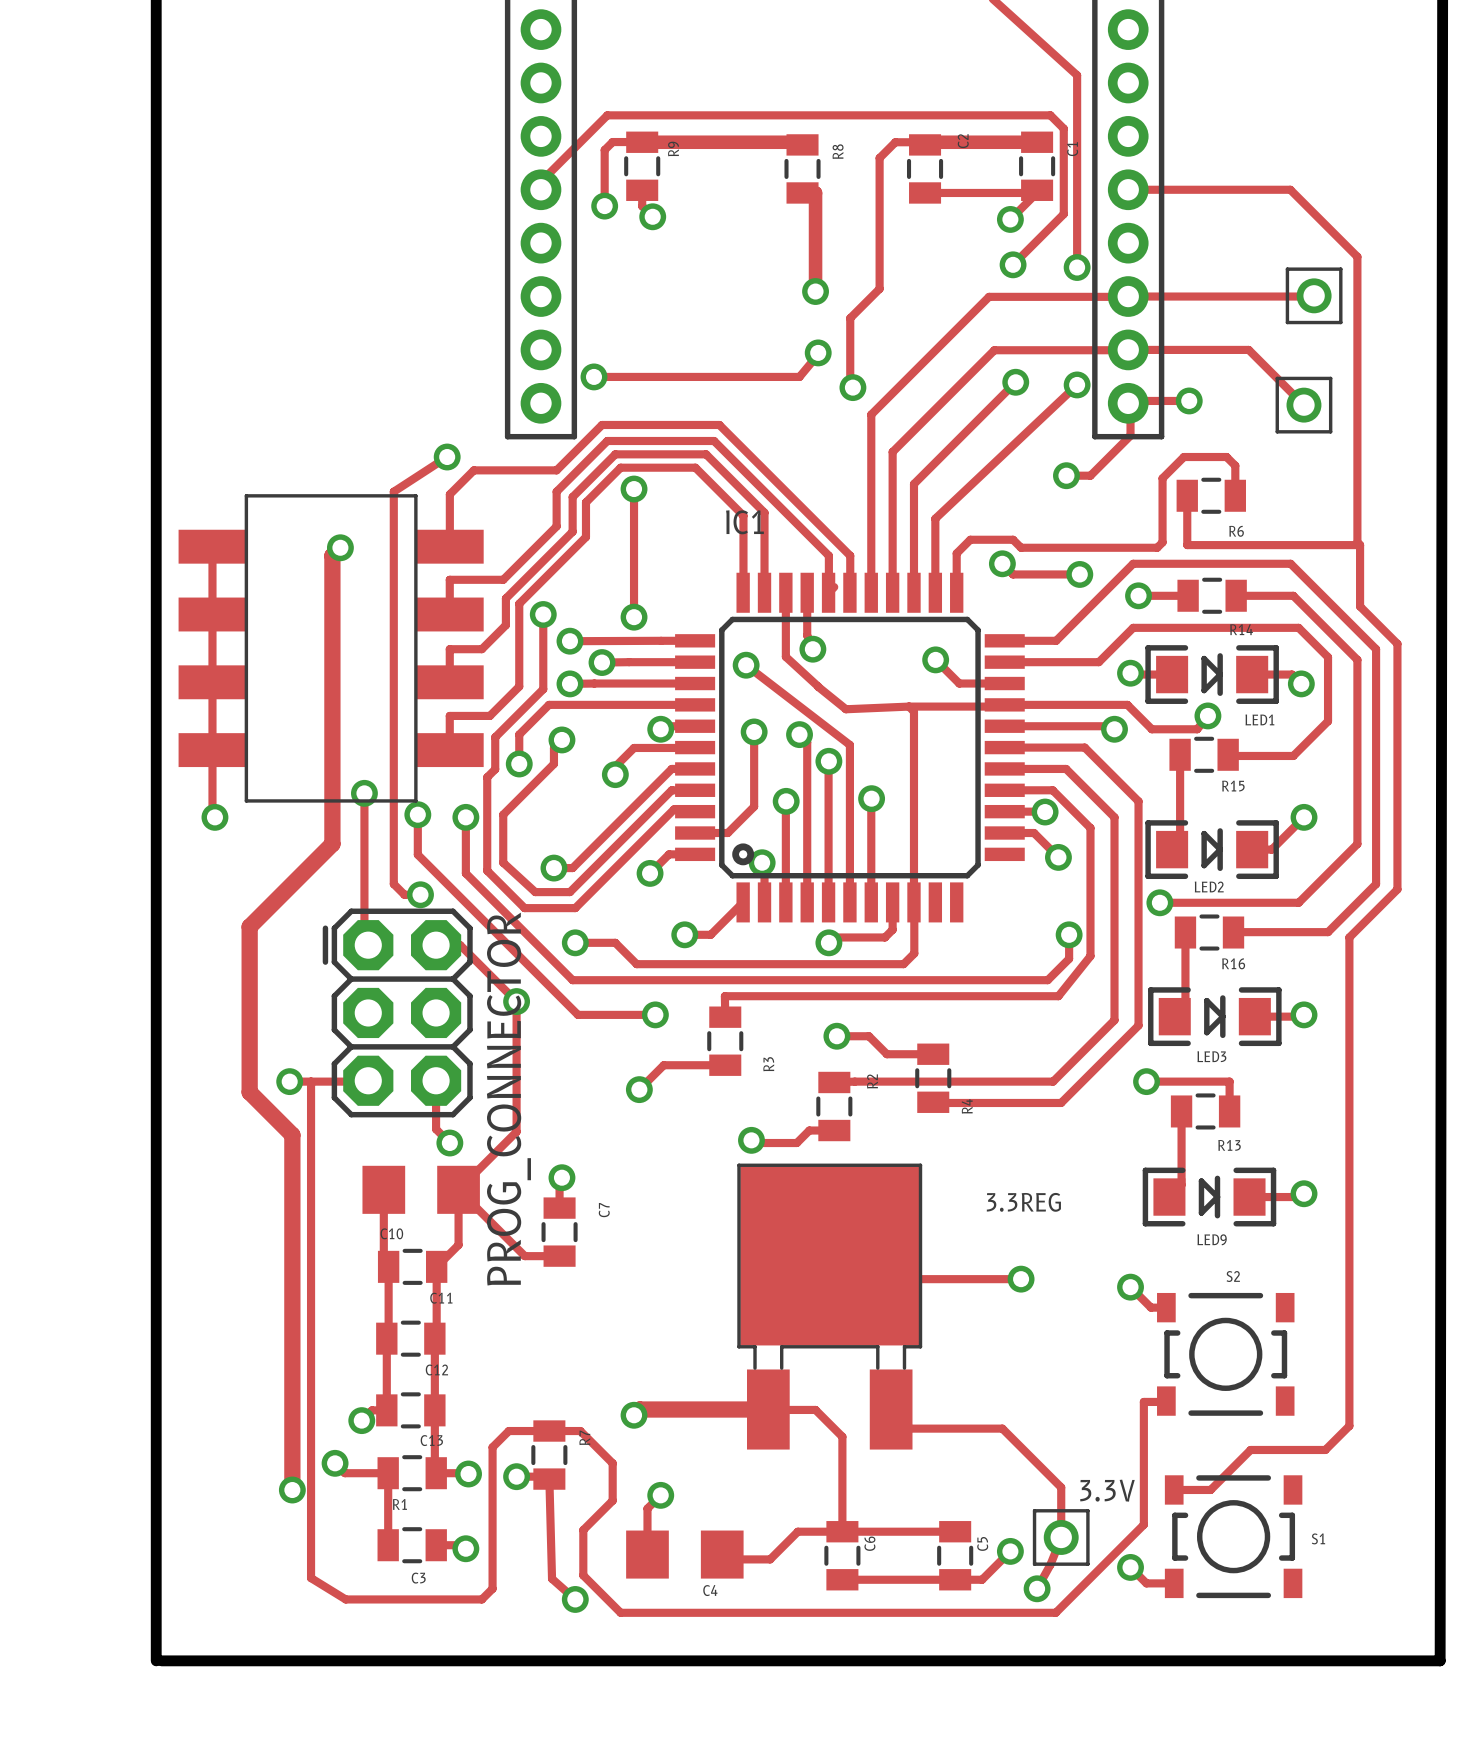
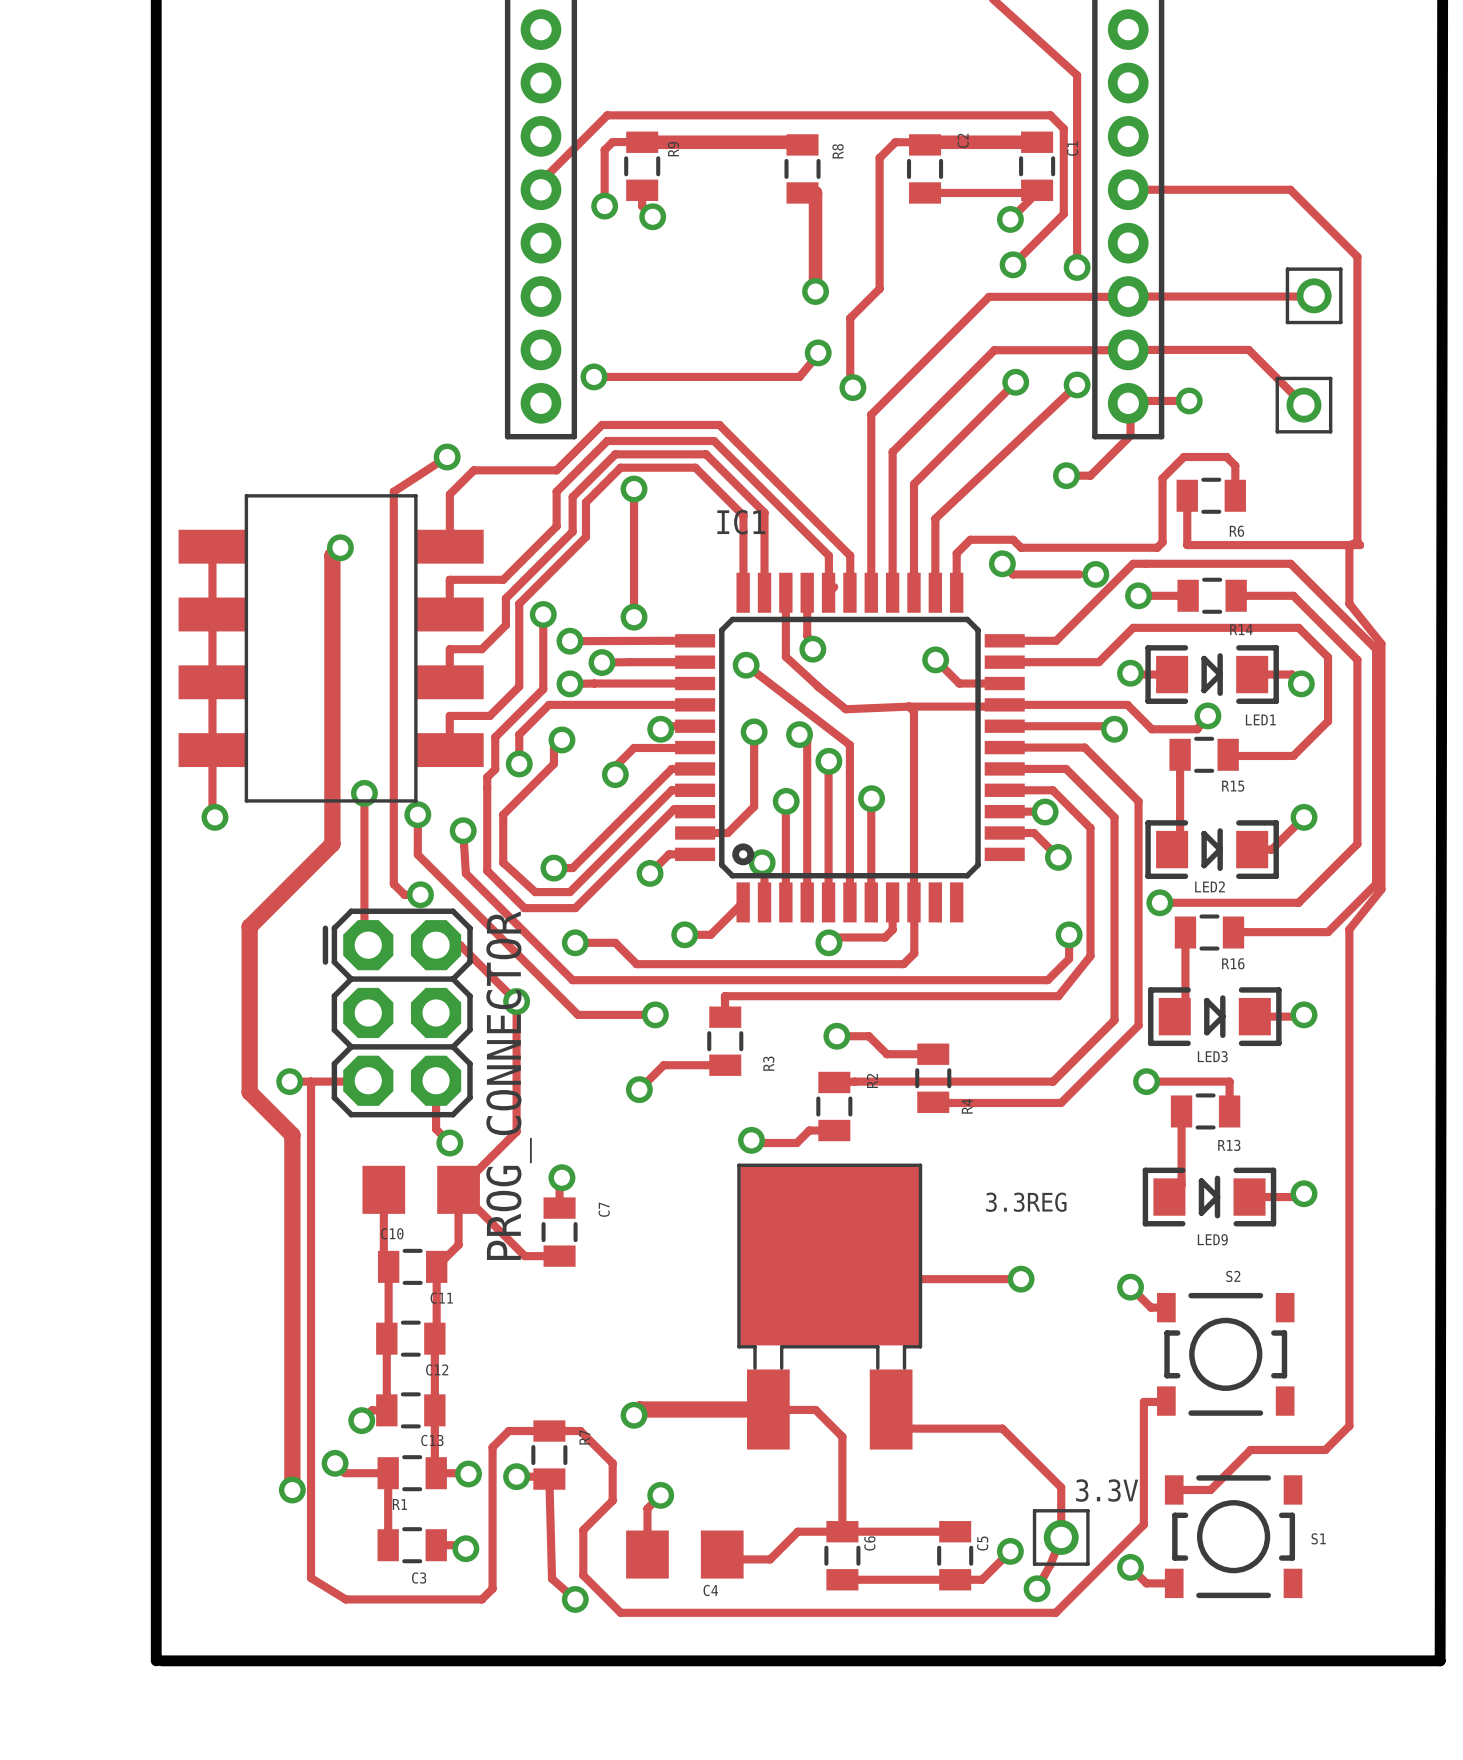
track: (1360, 545) (1360, 606) (1397, 643) (1397, 889) (1349, 937) -> (1357, 542) (1349, 545) (1349, 603) (1381, 643) (1381, 889) (1349, 929) (1349, 937)
via position: (1079, 574) -> (1095, 574)
track: (465, 817) (465, 873) -> (463, 830) (465, 873)
via position: (465, 817) -> (463, 830)

